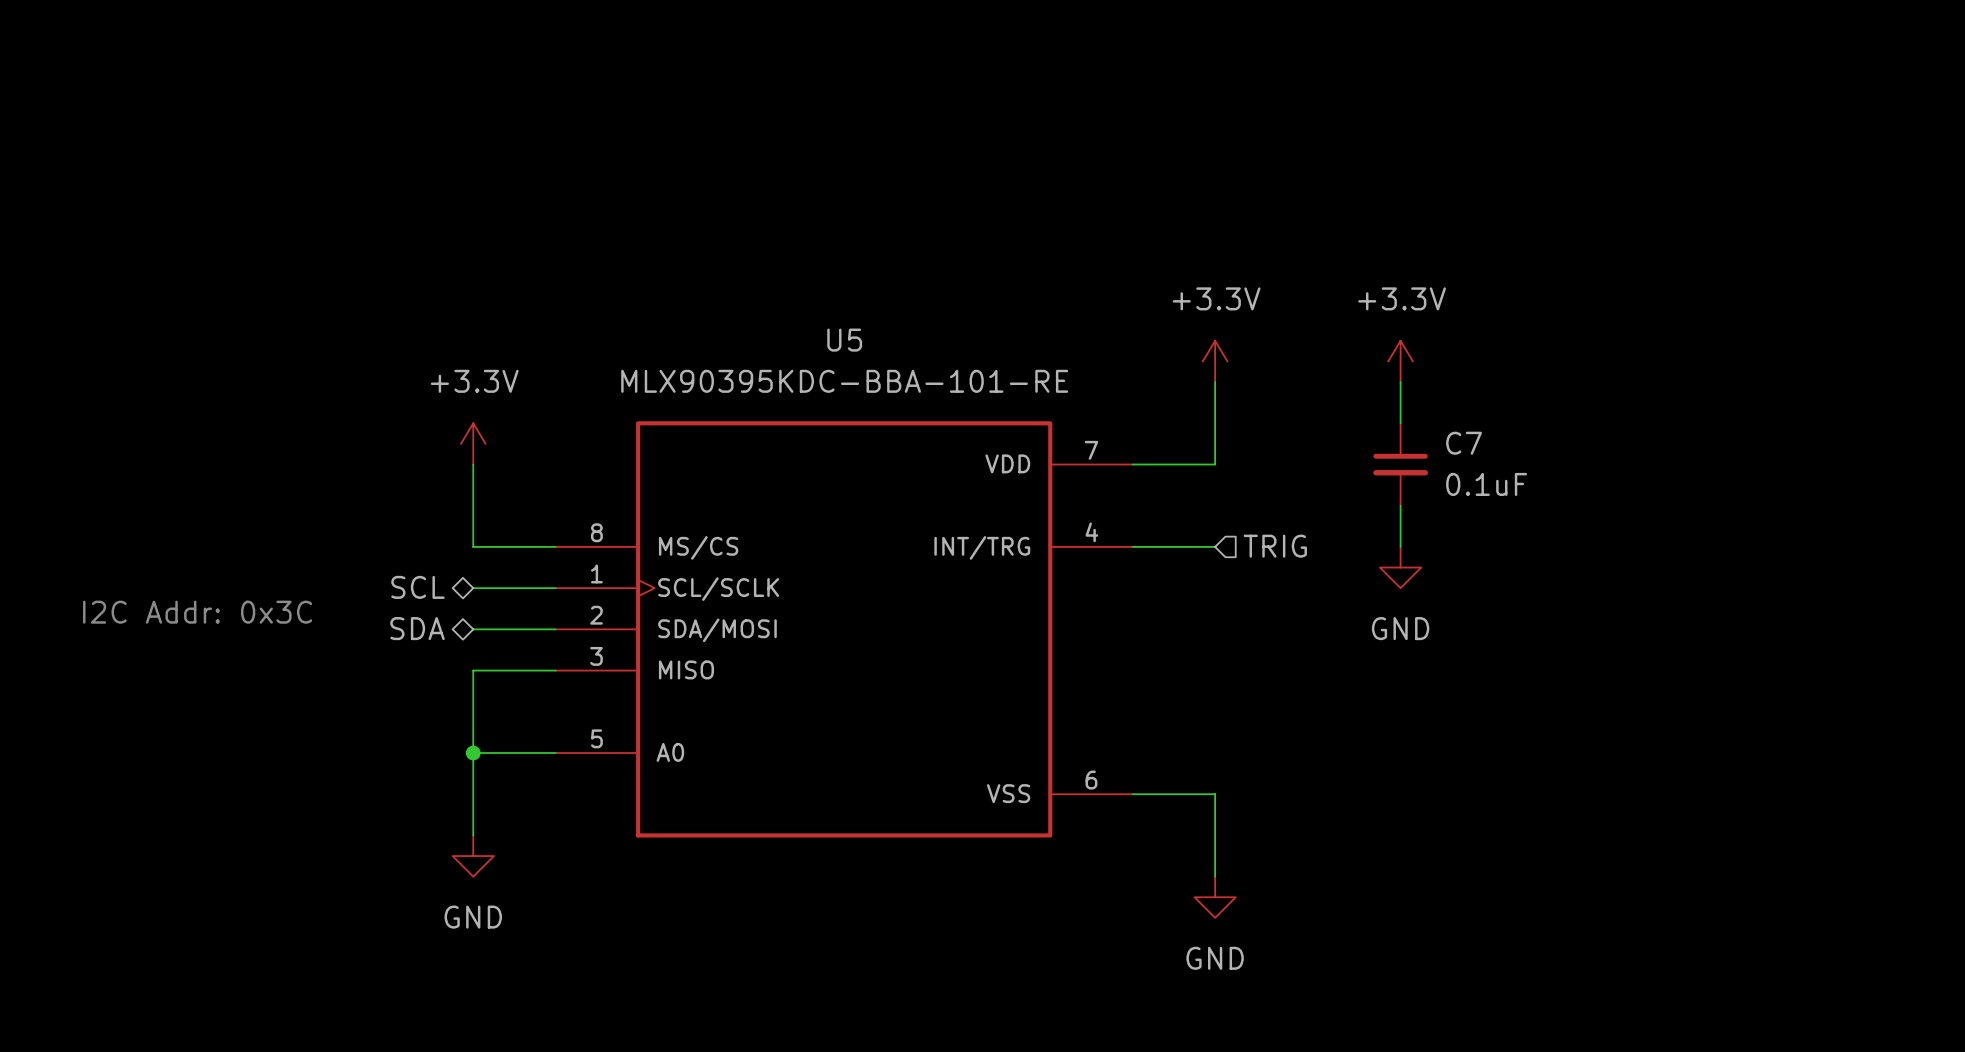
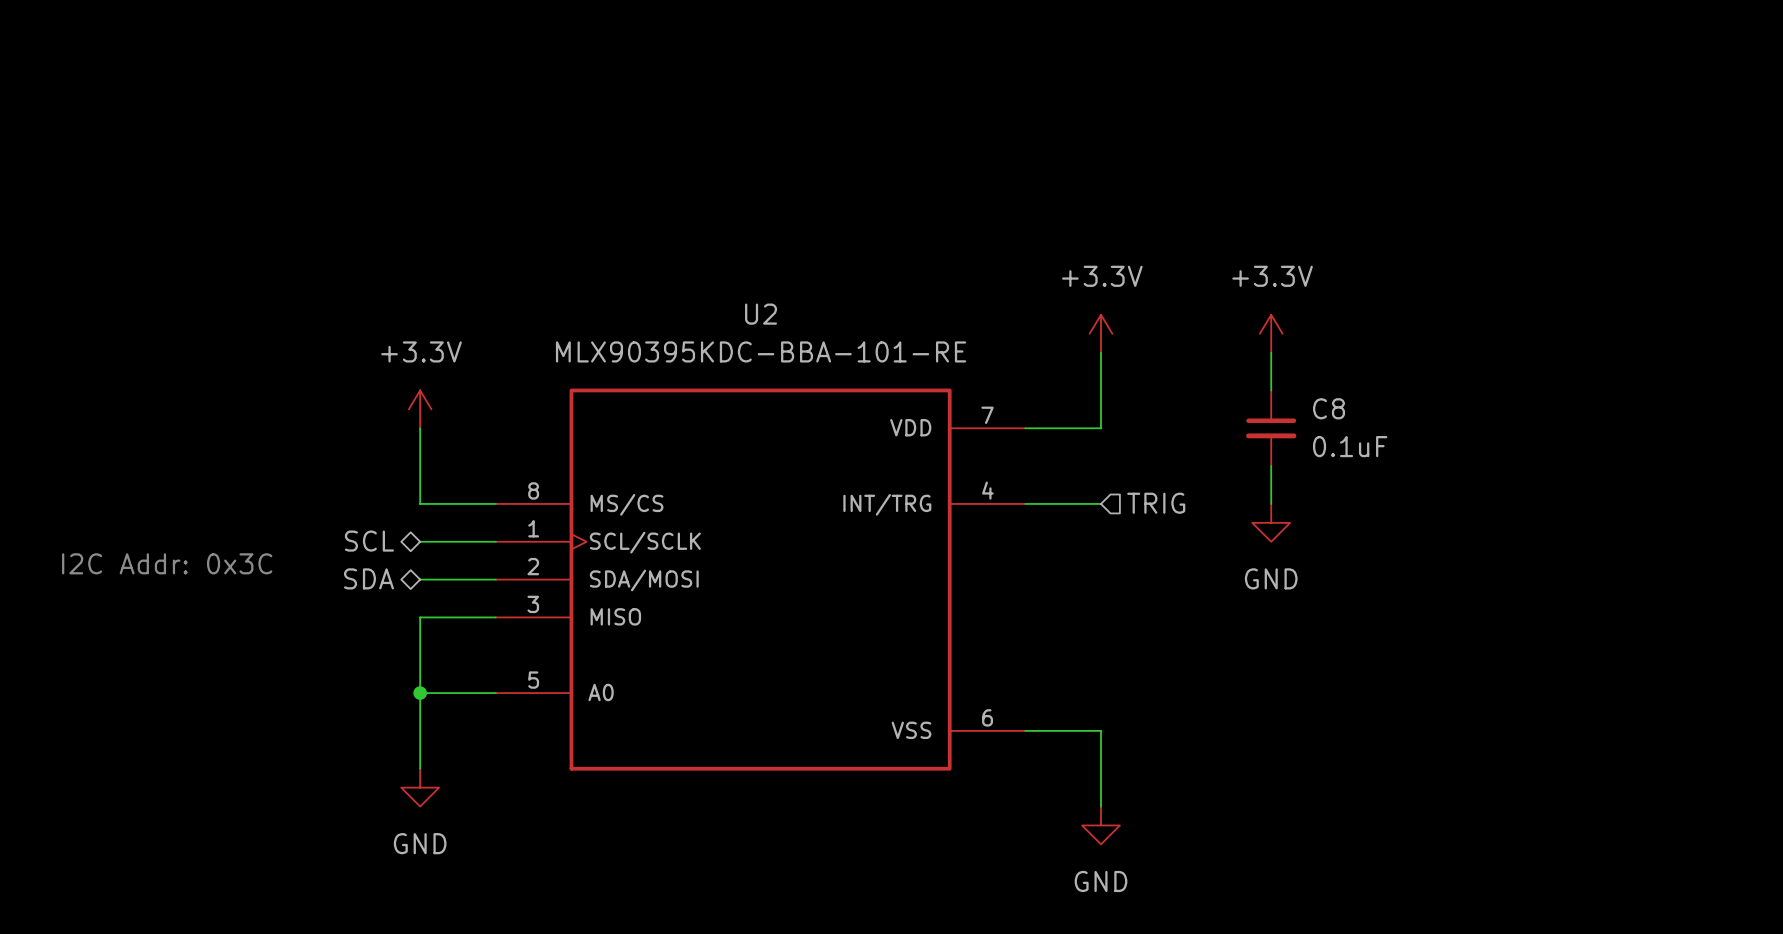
U5 name: U5 (844, 340) -> U2 (761, 314)
C7 name: C7 (1464, 443) -> C8 (1329, 408)

